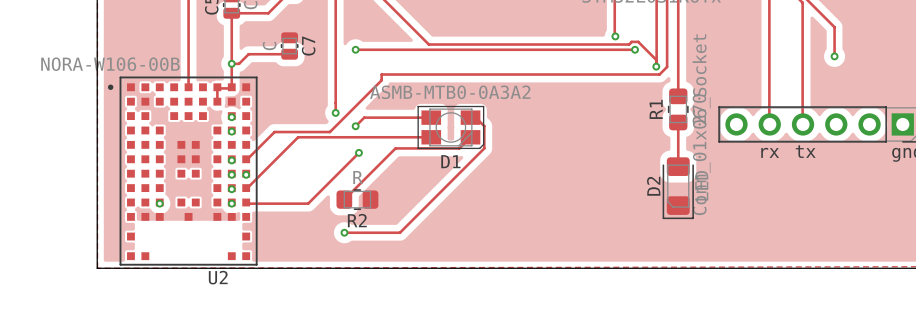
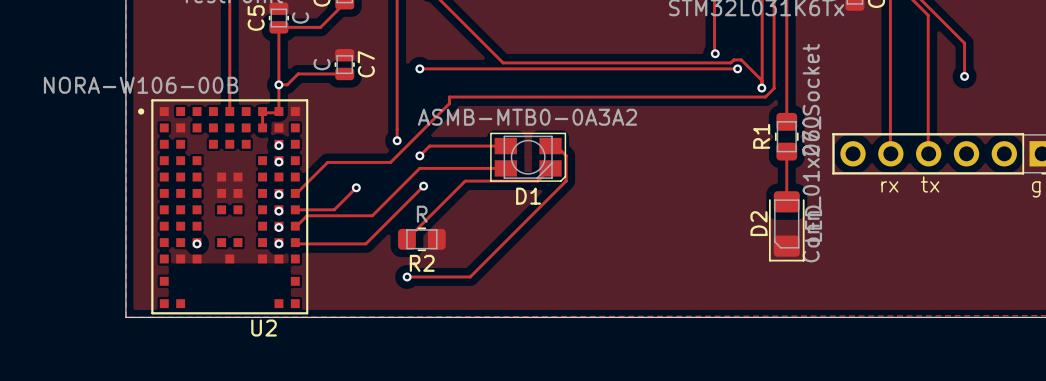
track: (355, 137) (298, 137) (256, 178) -> (419, 168) (372, 215) (307, 215)
track: none -> (356, 187) (334, 209) (295, 209)
via position: (246, 174) -> (356, 187)

